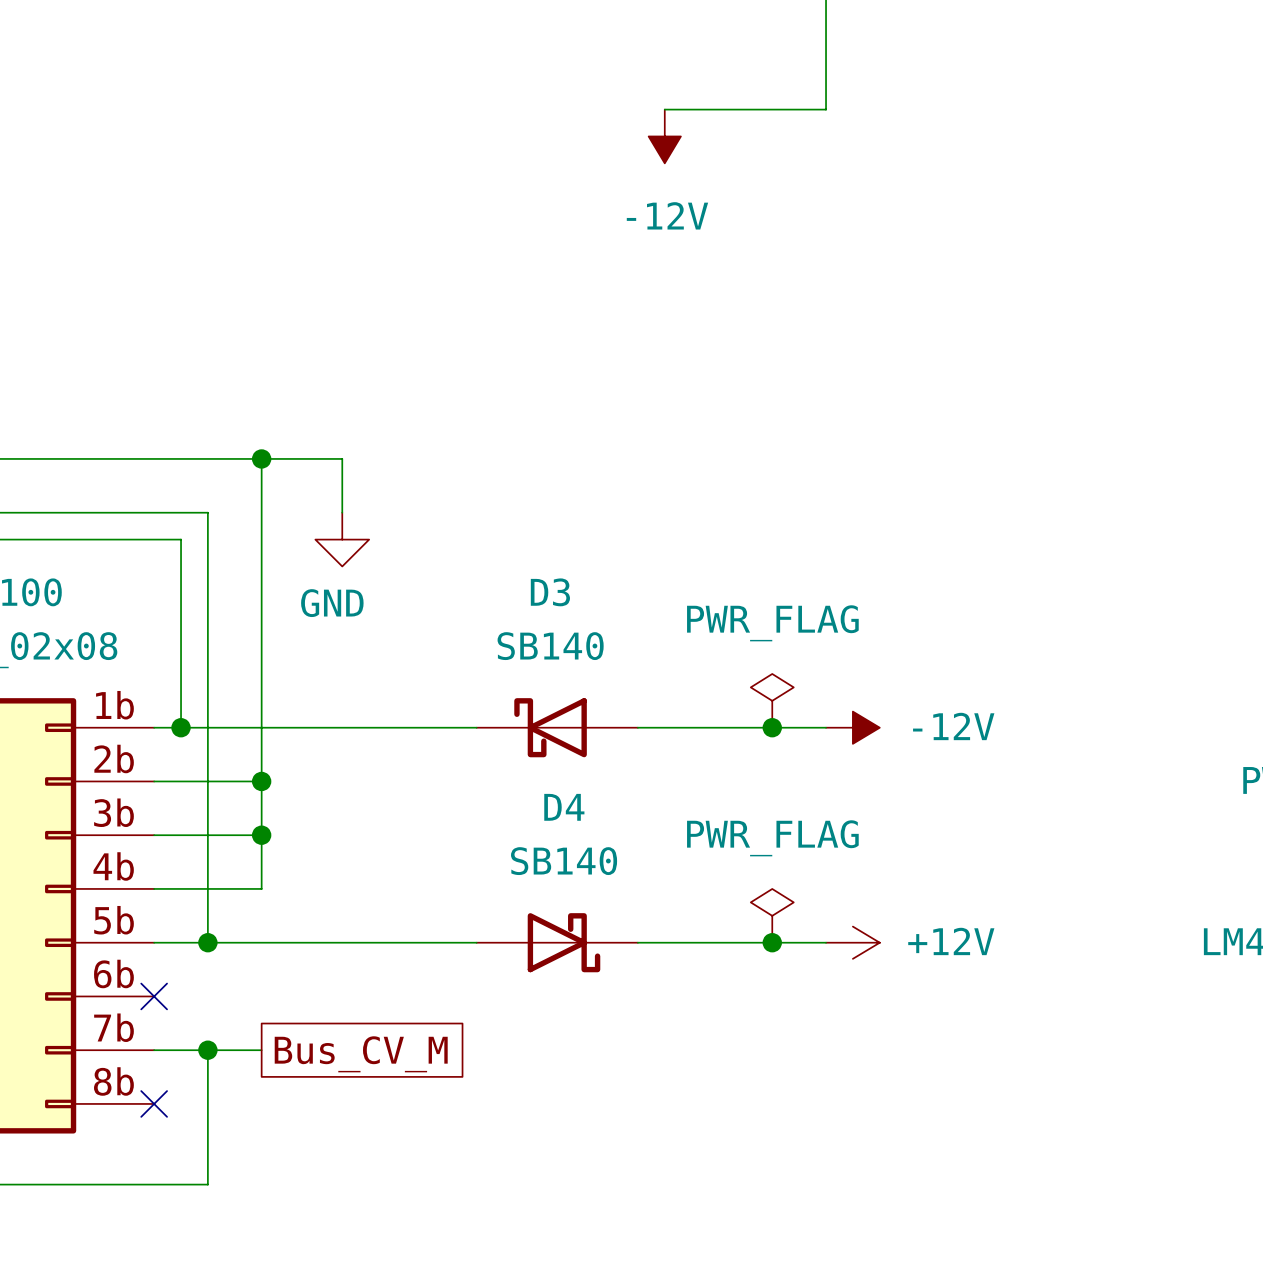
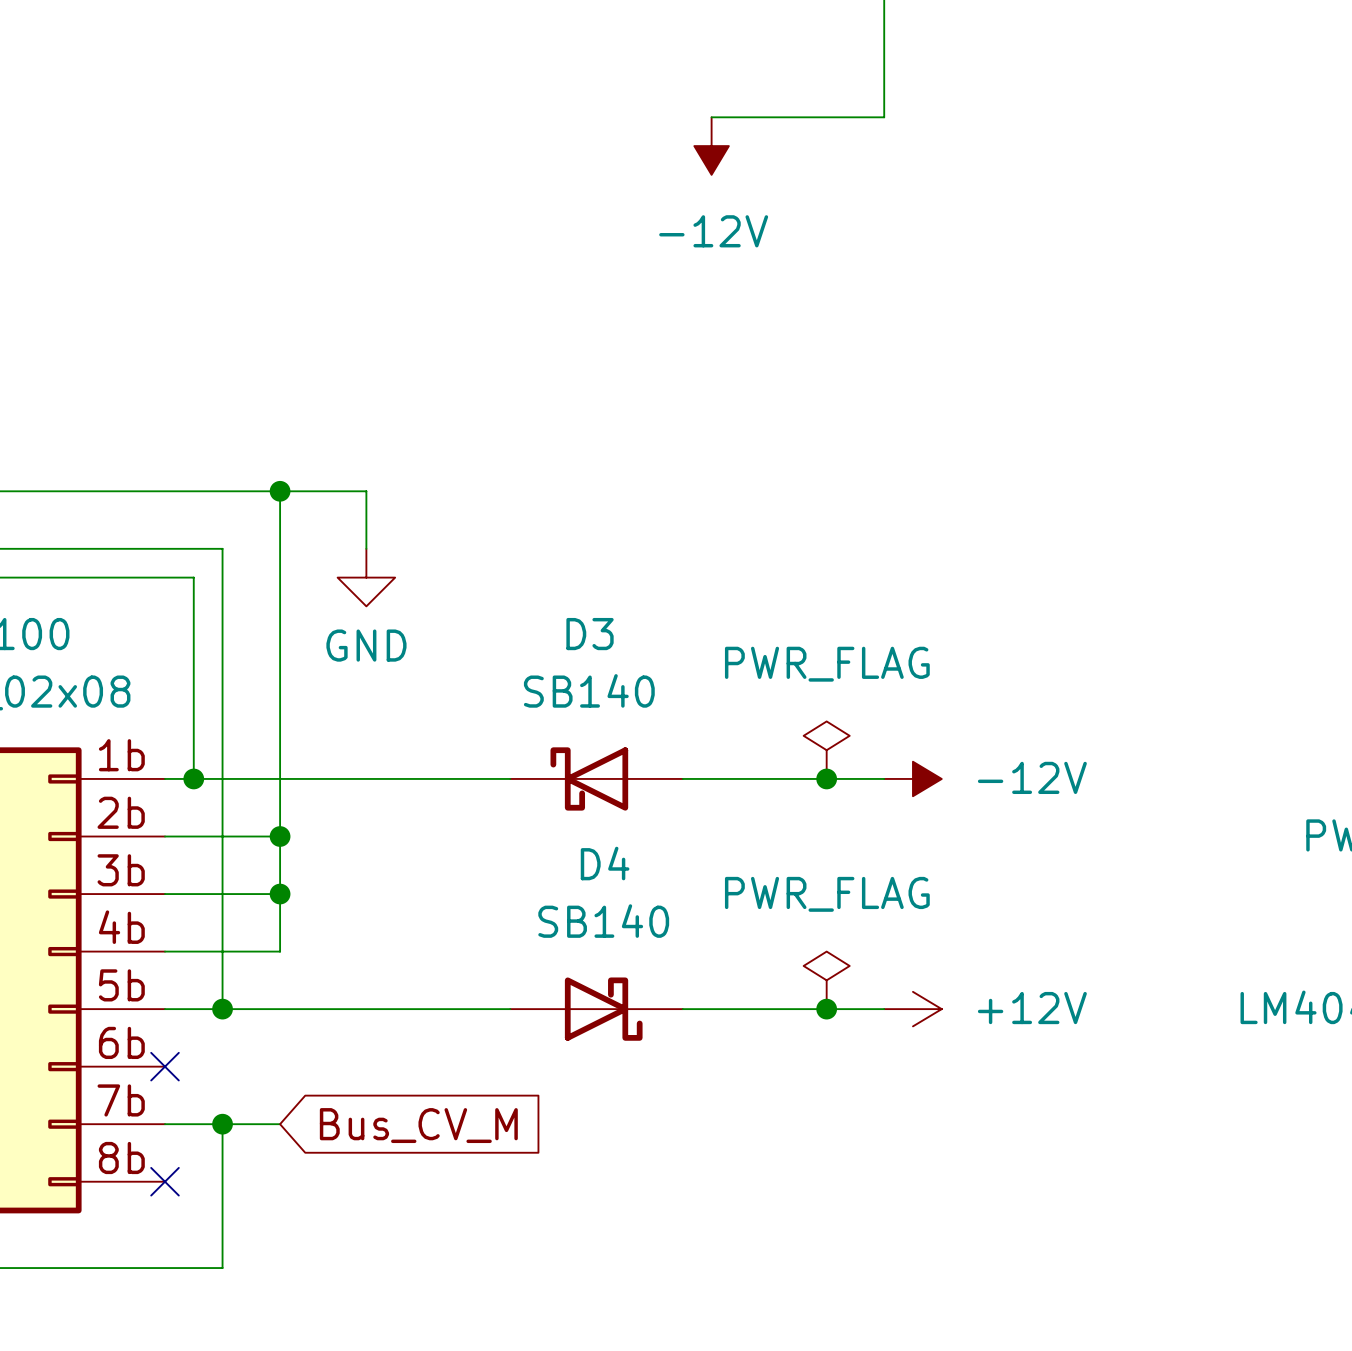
global label shape: passive (361, 1054) -> input (418, 1125)

